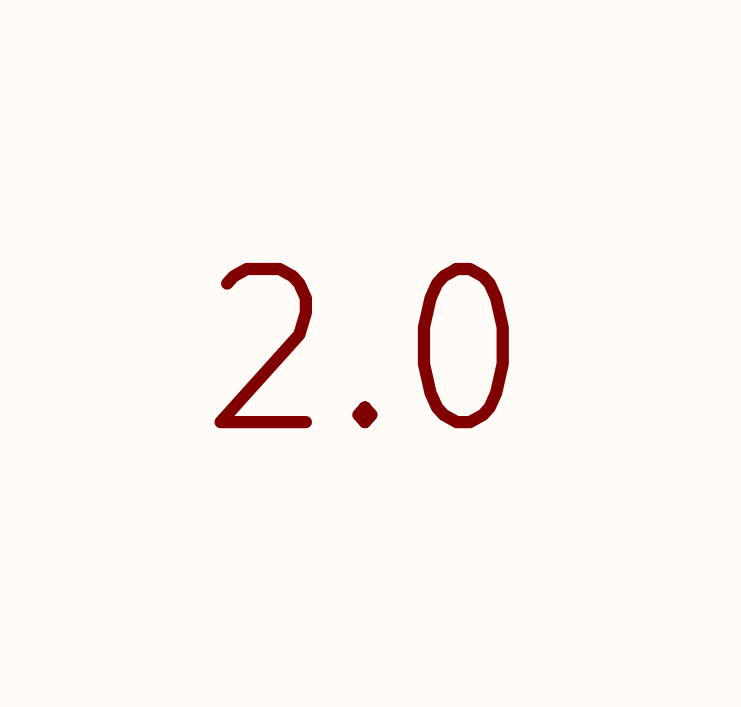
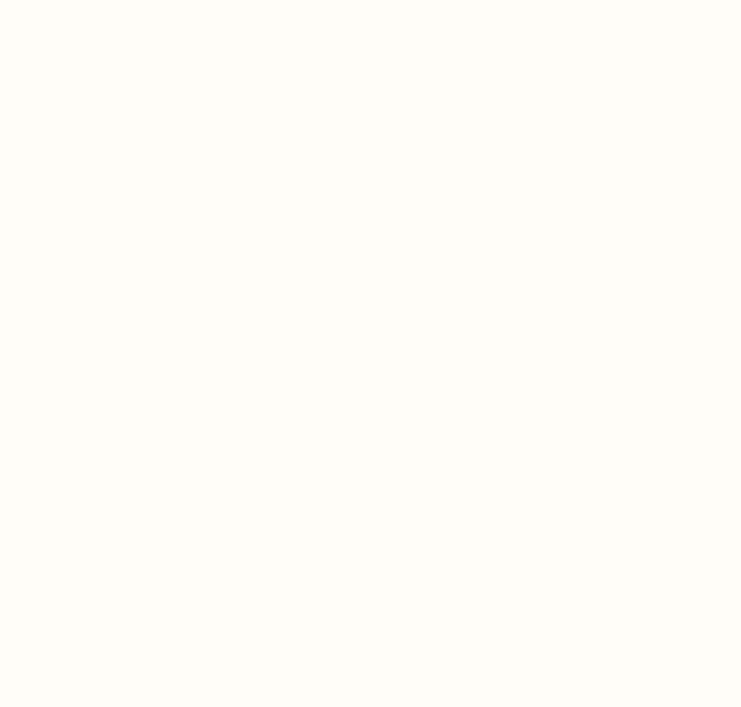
text: 2.0 (361, 345) -> none

